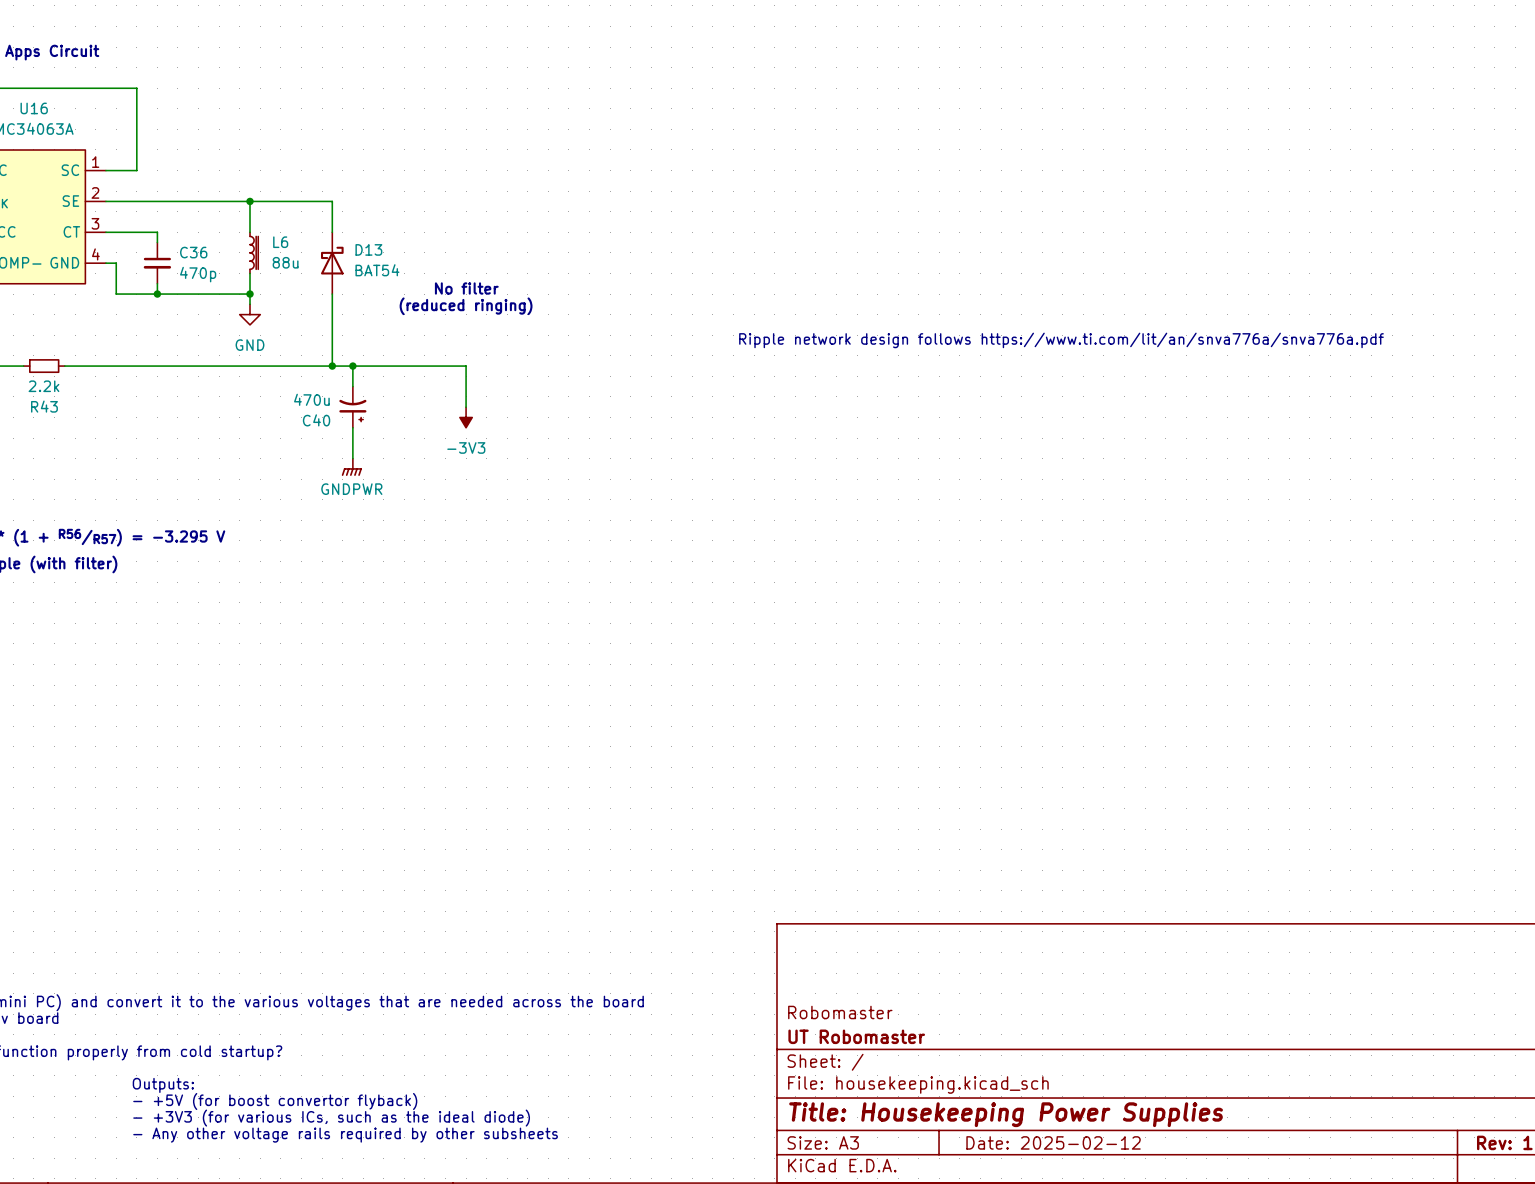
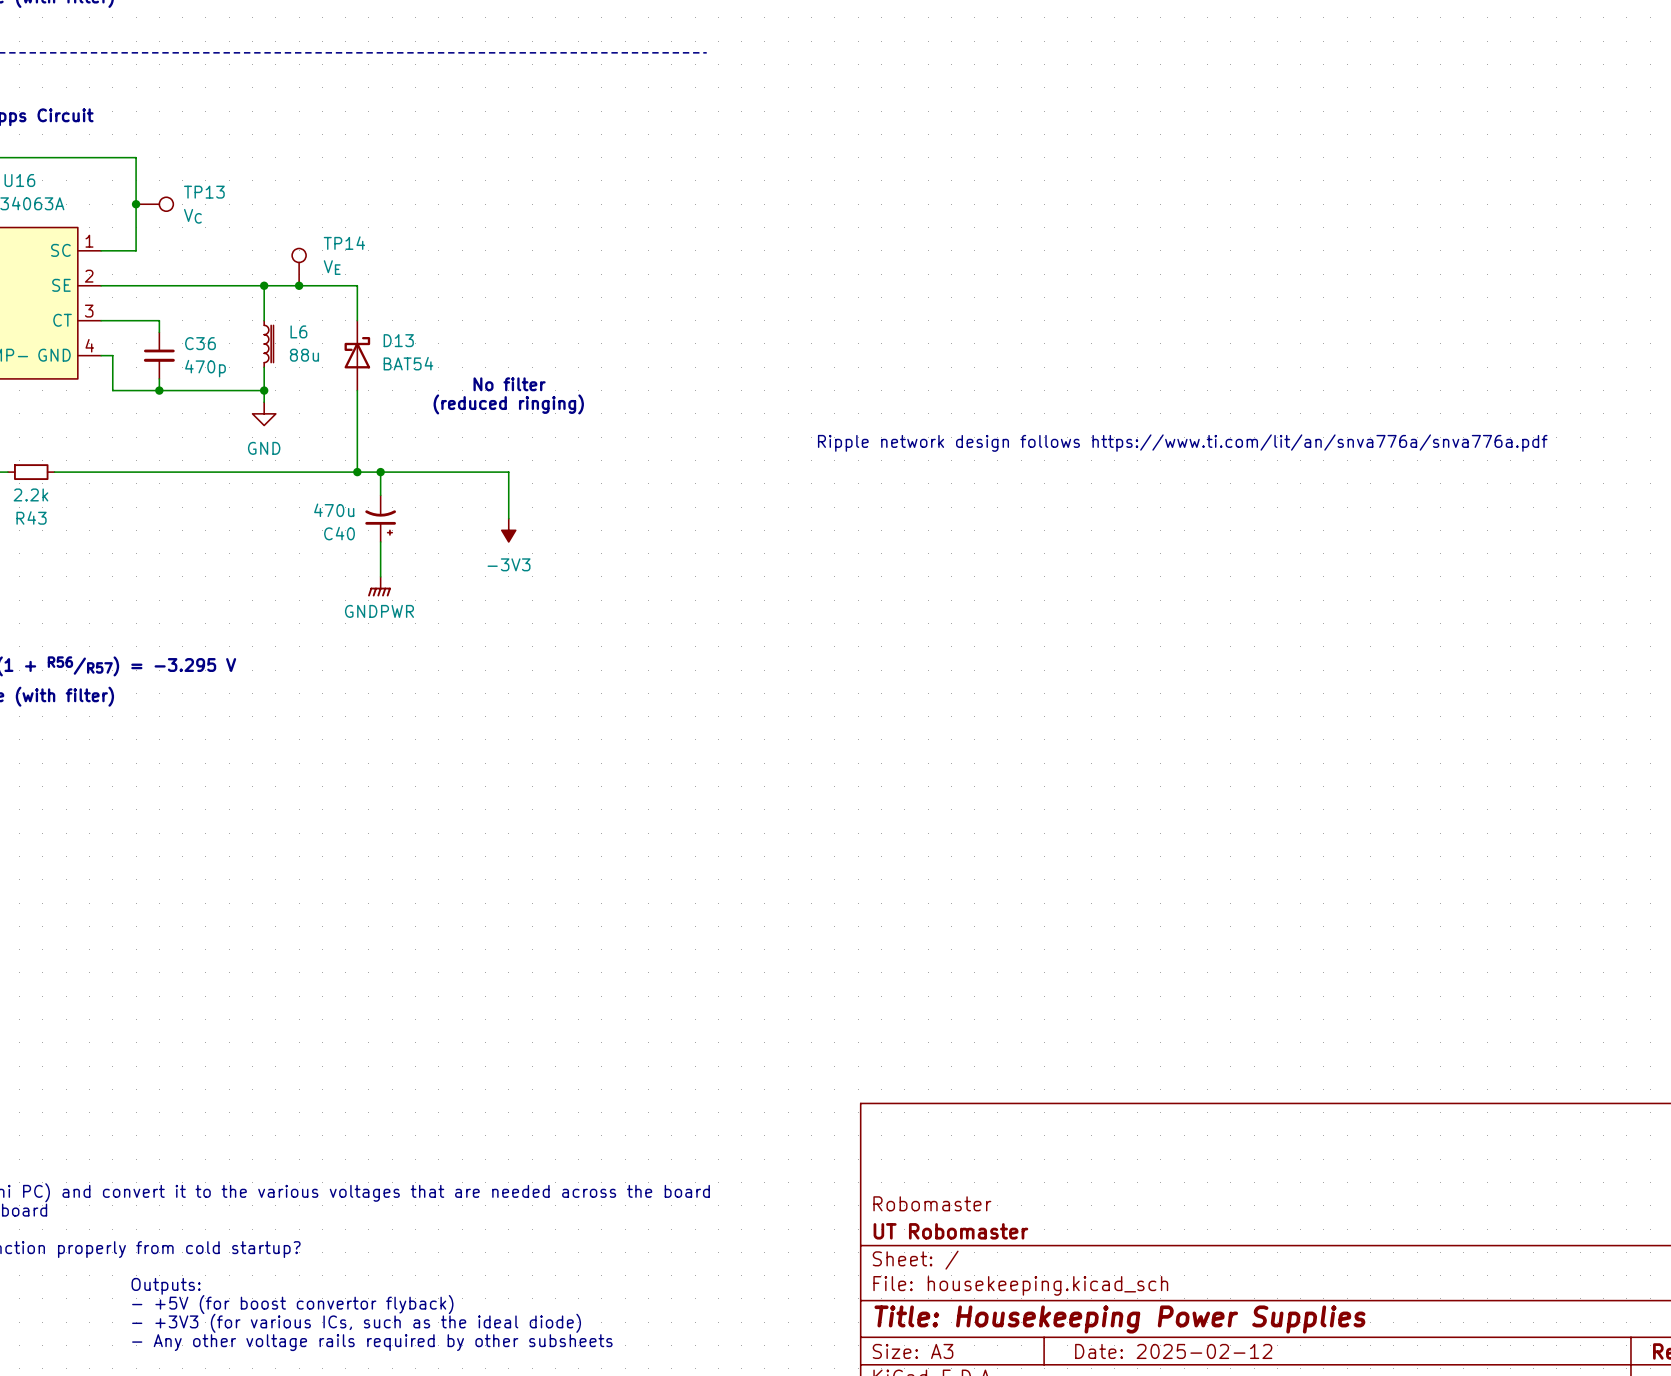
junction: none -> (136, 204)
TP13: none -> VC (154, 204)
TP14: none -> VE (299, 267)
junction: none -> (299, 285)

